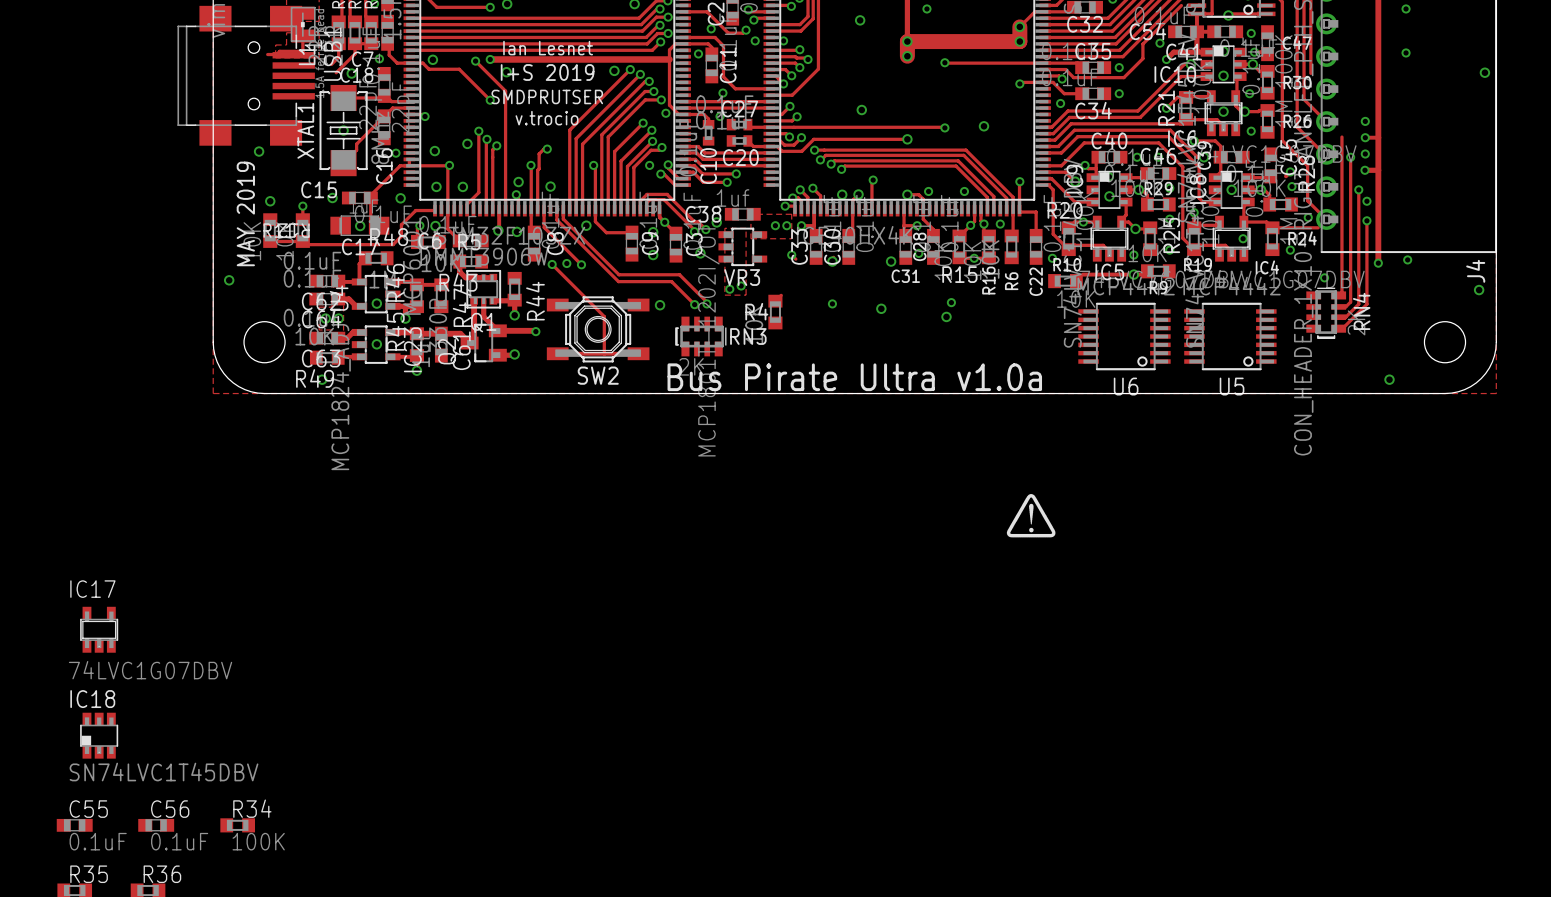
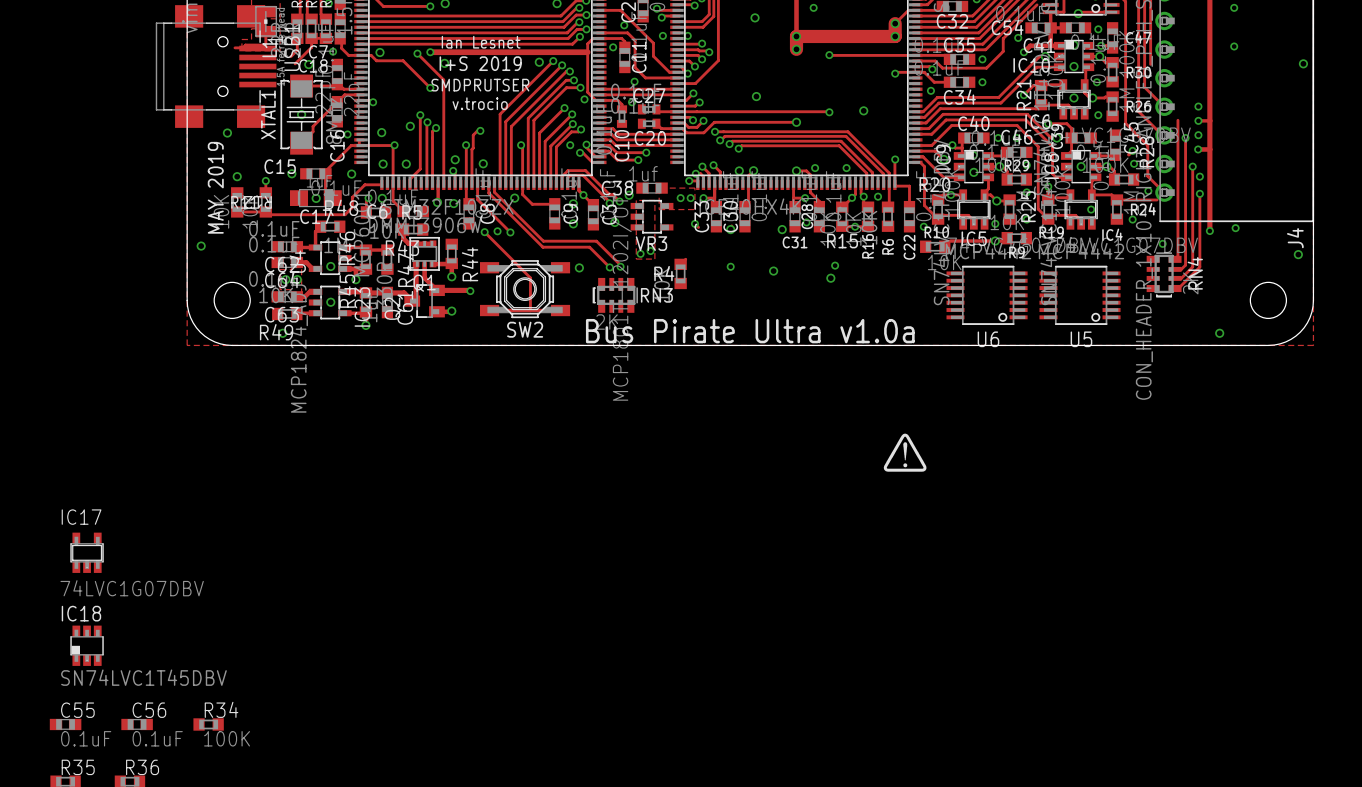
track: (746, 30) (743, 33) (728, 33) -> (675, 72) (669, 72) (653, 56) (653, 43) (639, 29)
via: (746, 30) -> none
track: (873, 180) (871, 210) -> none
via: (873, 180) -> none

